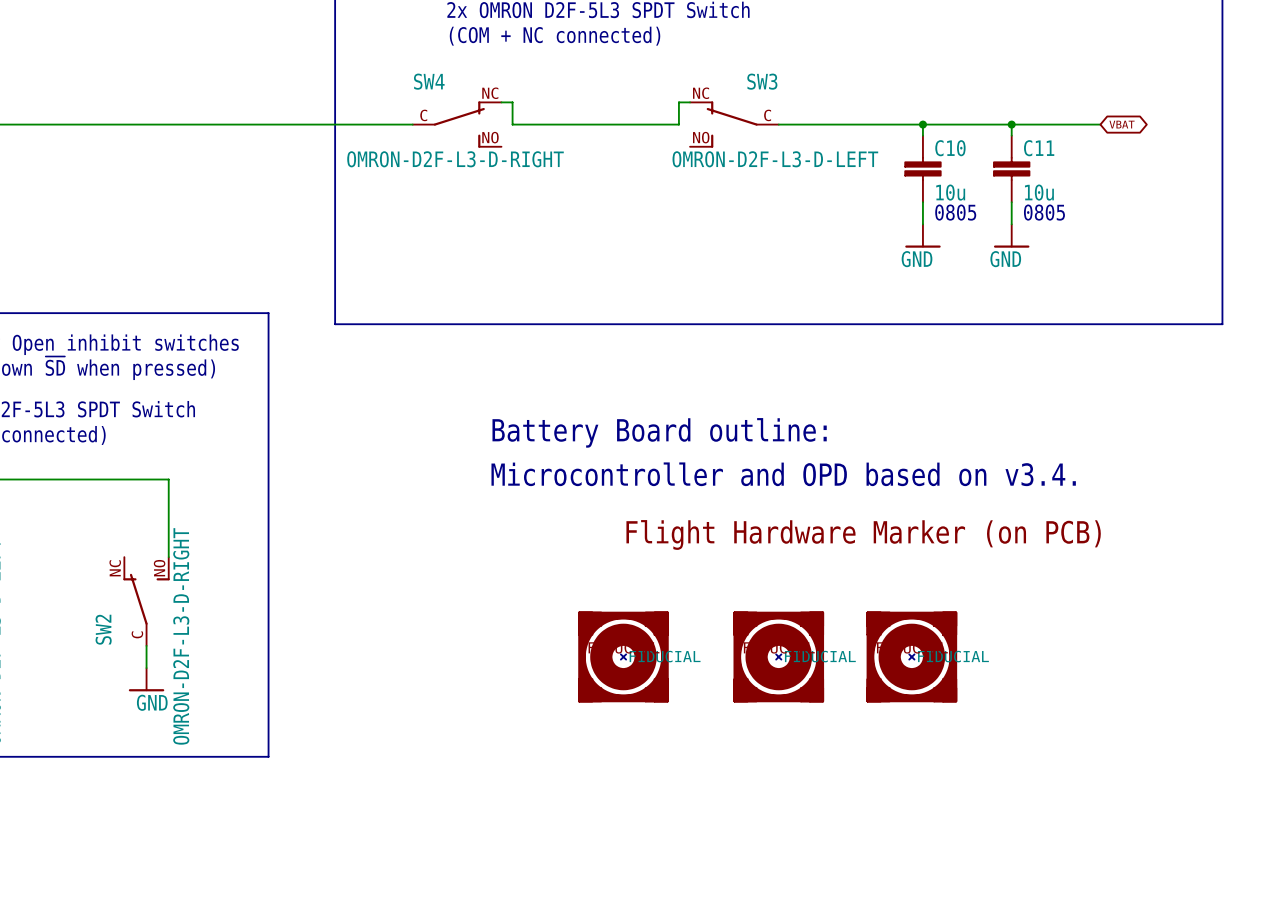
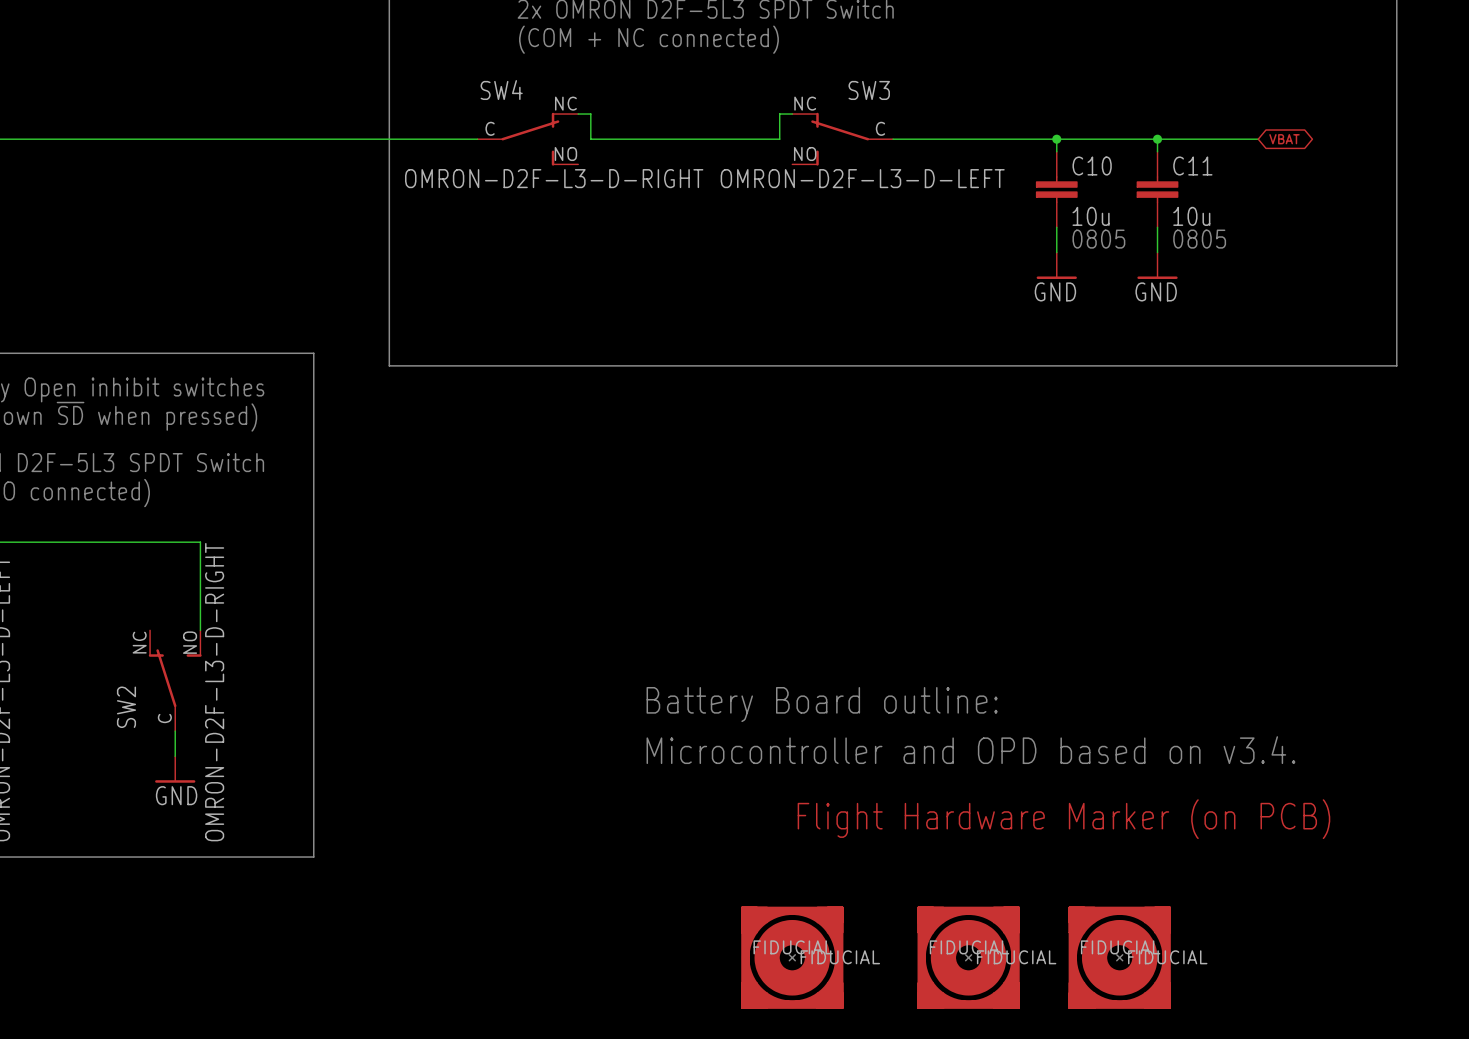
text position: Battery Board outline: (659, 432) -> Battery Board outline: (822, 704)
text position: Microcontroller and OPD based on v3.4. (783, 474) -> Microcontroller and OPD based on v3.4. (970, 750)
part position: (863, 534) -> (1063, 819)
part: (623, 656) -> none
part: (778, 656) -> none
part: (911, 656) -> none
part: none -> (792, 957)
part: none -> (968, 957)
part: none -> (1119, 957)

